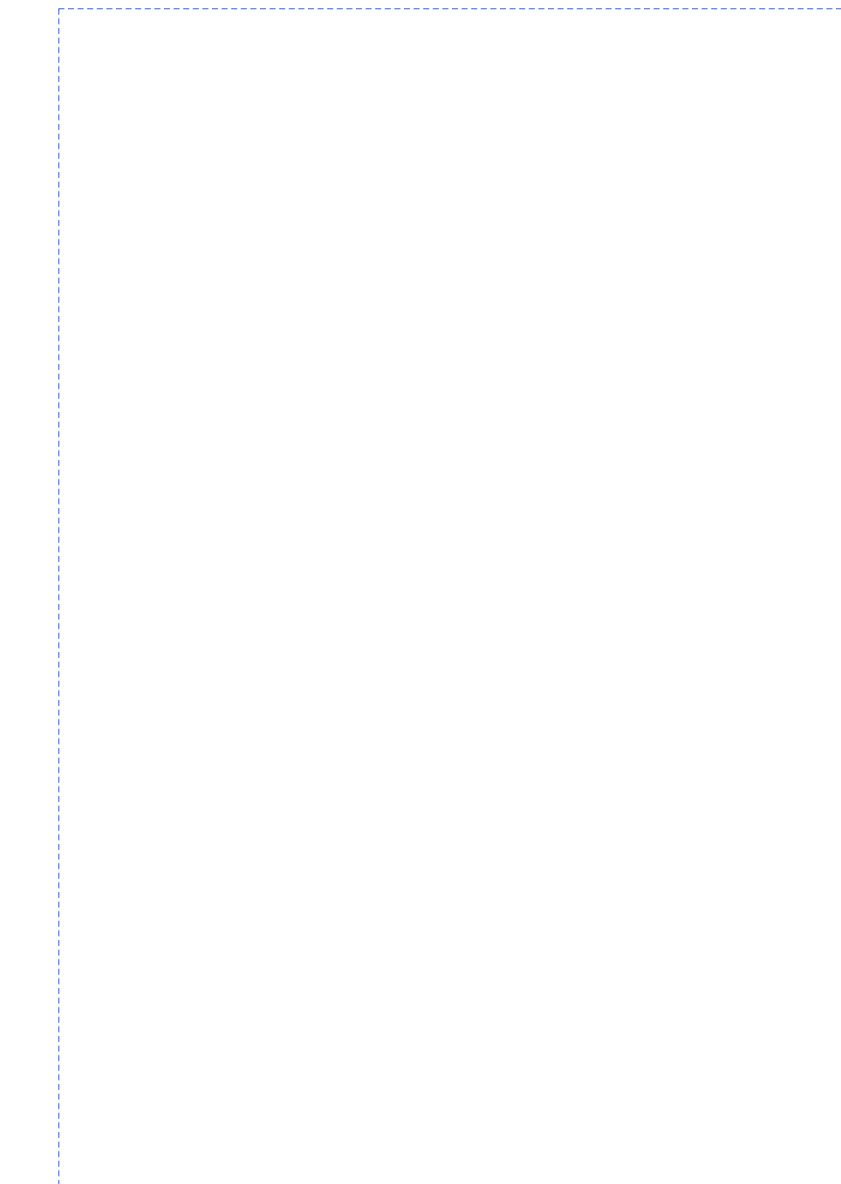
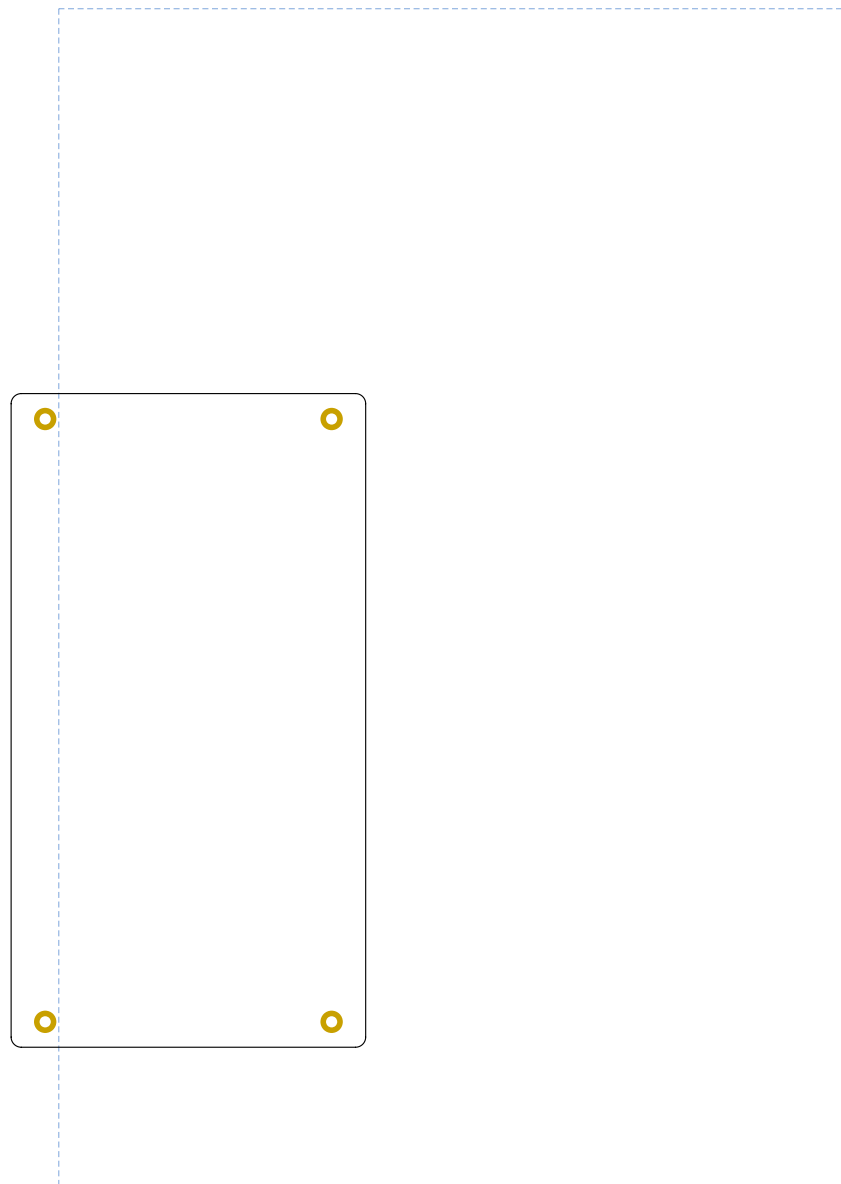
board edge: none -> (355, 393) (21, 393) (15, 395) (12, 399) (11, 1037) (12, 1042) (16, 1046) (355, 1047) (360, 1045) (364, 1041) (365, 403) (362, 396) (355, 393)
part: none -> (45, 419)
part: none -> (331, 419)
part: none -> (45, 1021)
part: none -> (331, 1021)

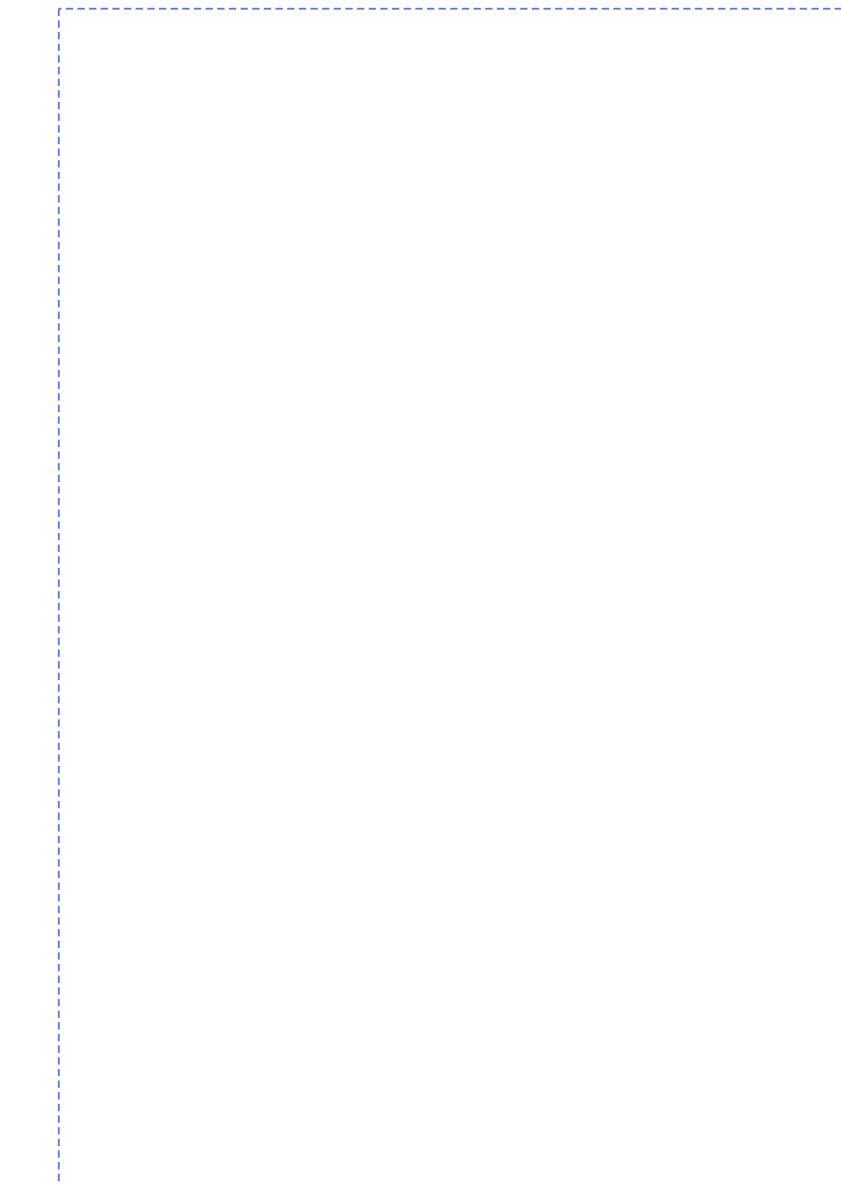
board edge: (355, 393) (21, 393) (15, 395) (12, 399) (11, 1037) (12, 1042) (16, 1046) (355, 1047) (360, 1045) (364, 1041) (365, 403) (362, 396) (355, 393) -> none
part: (45, 419) -> none
part: (331, 419) -> none
part: (45, 1021) -> none
part: (331, 1021) -> none

